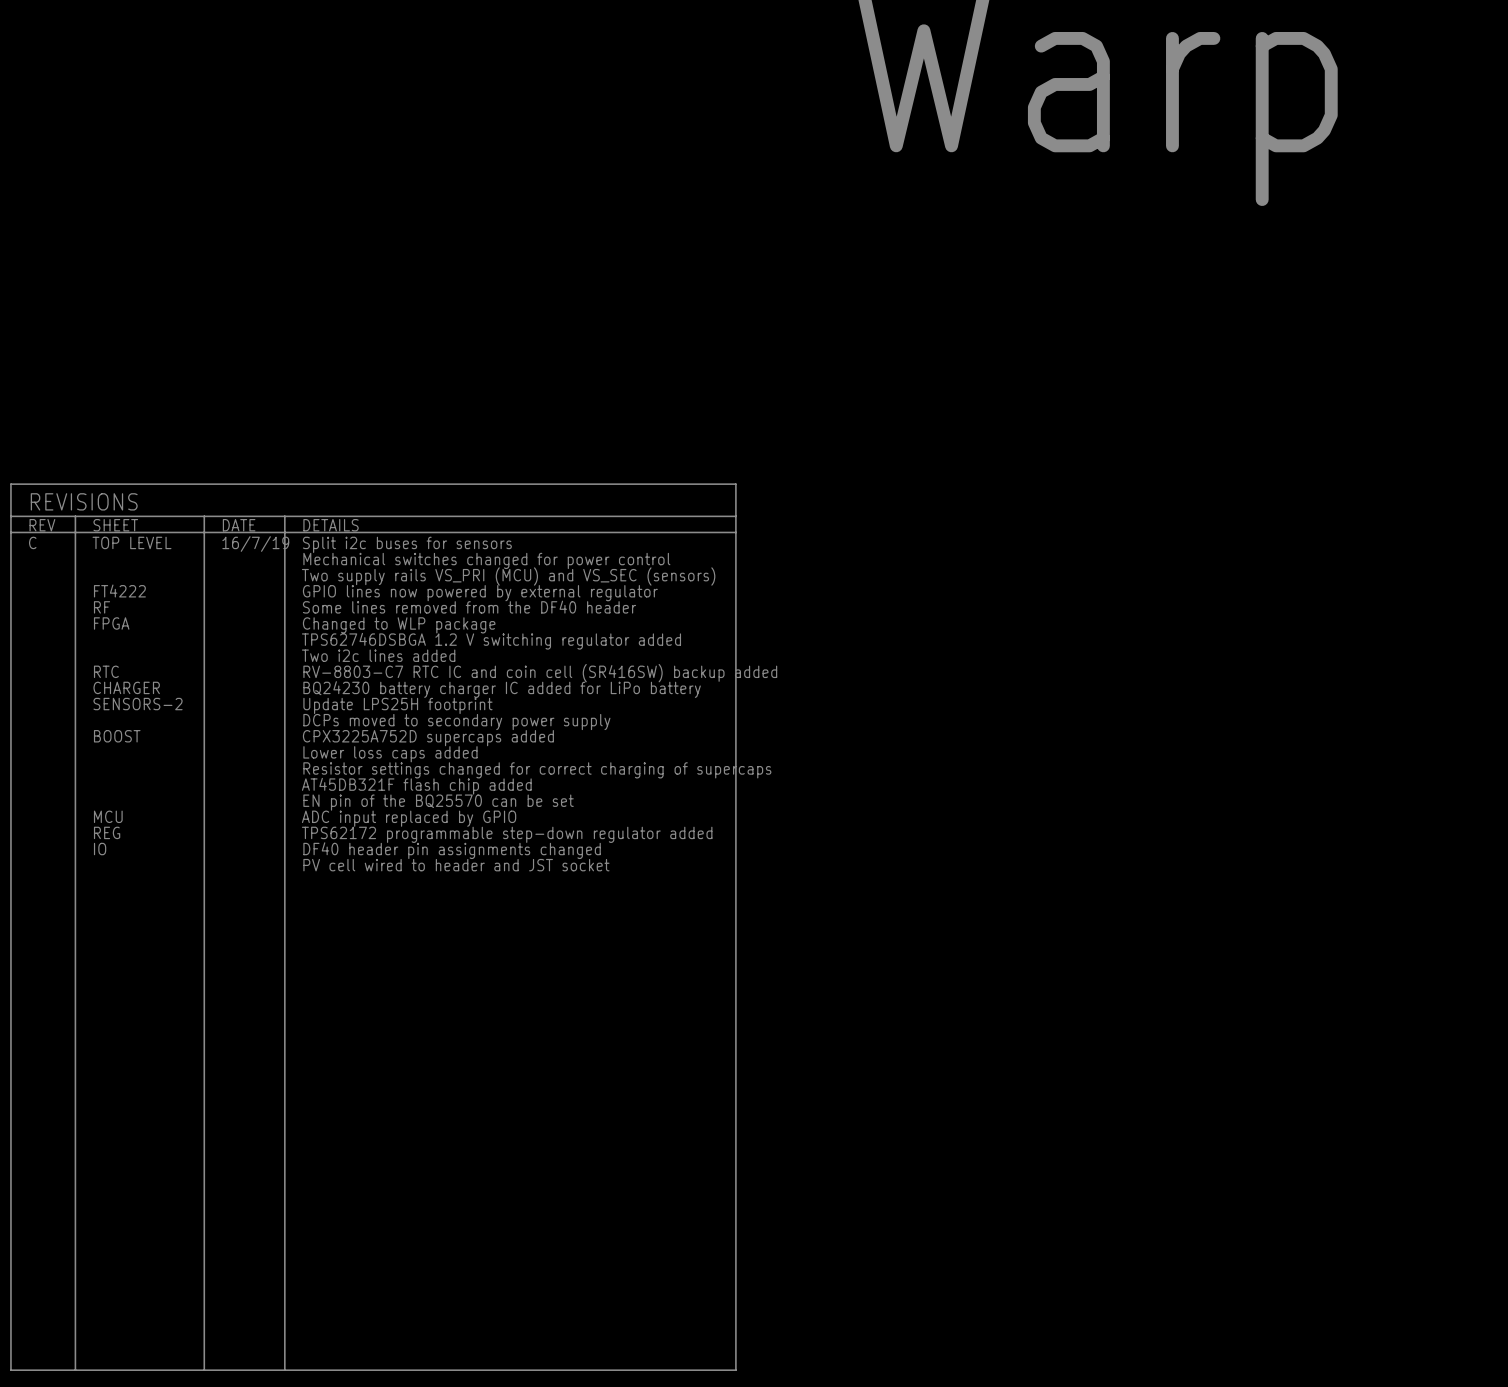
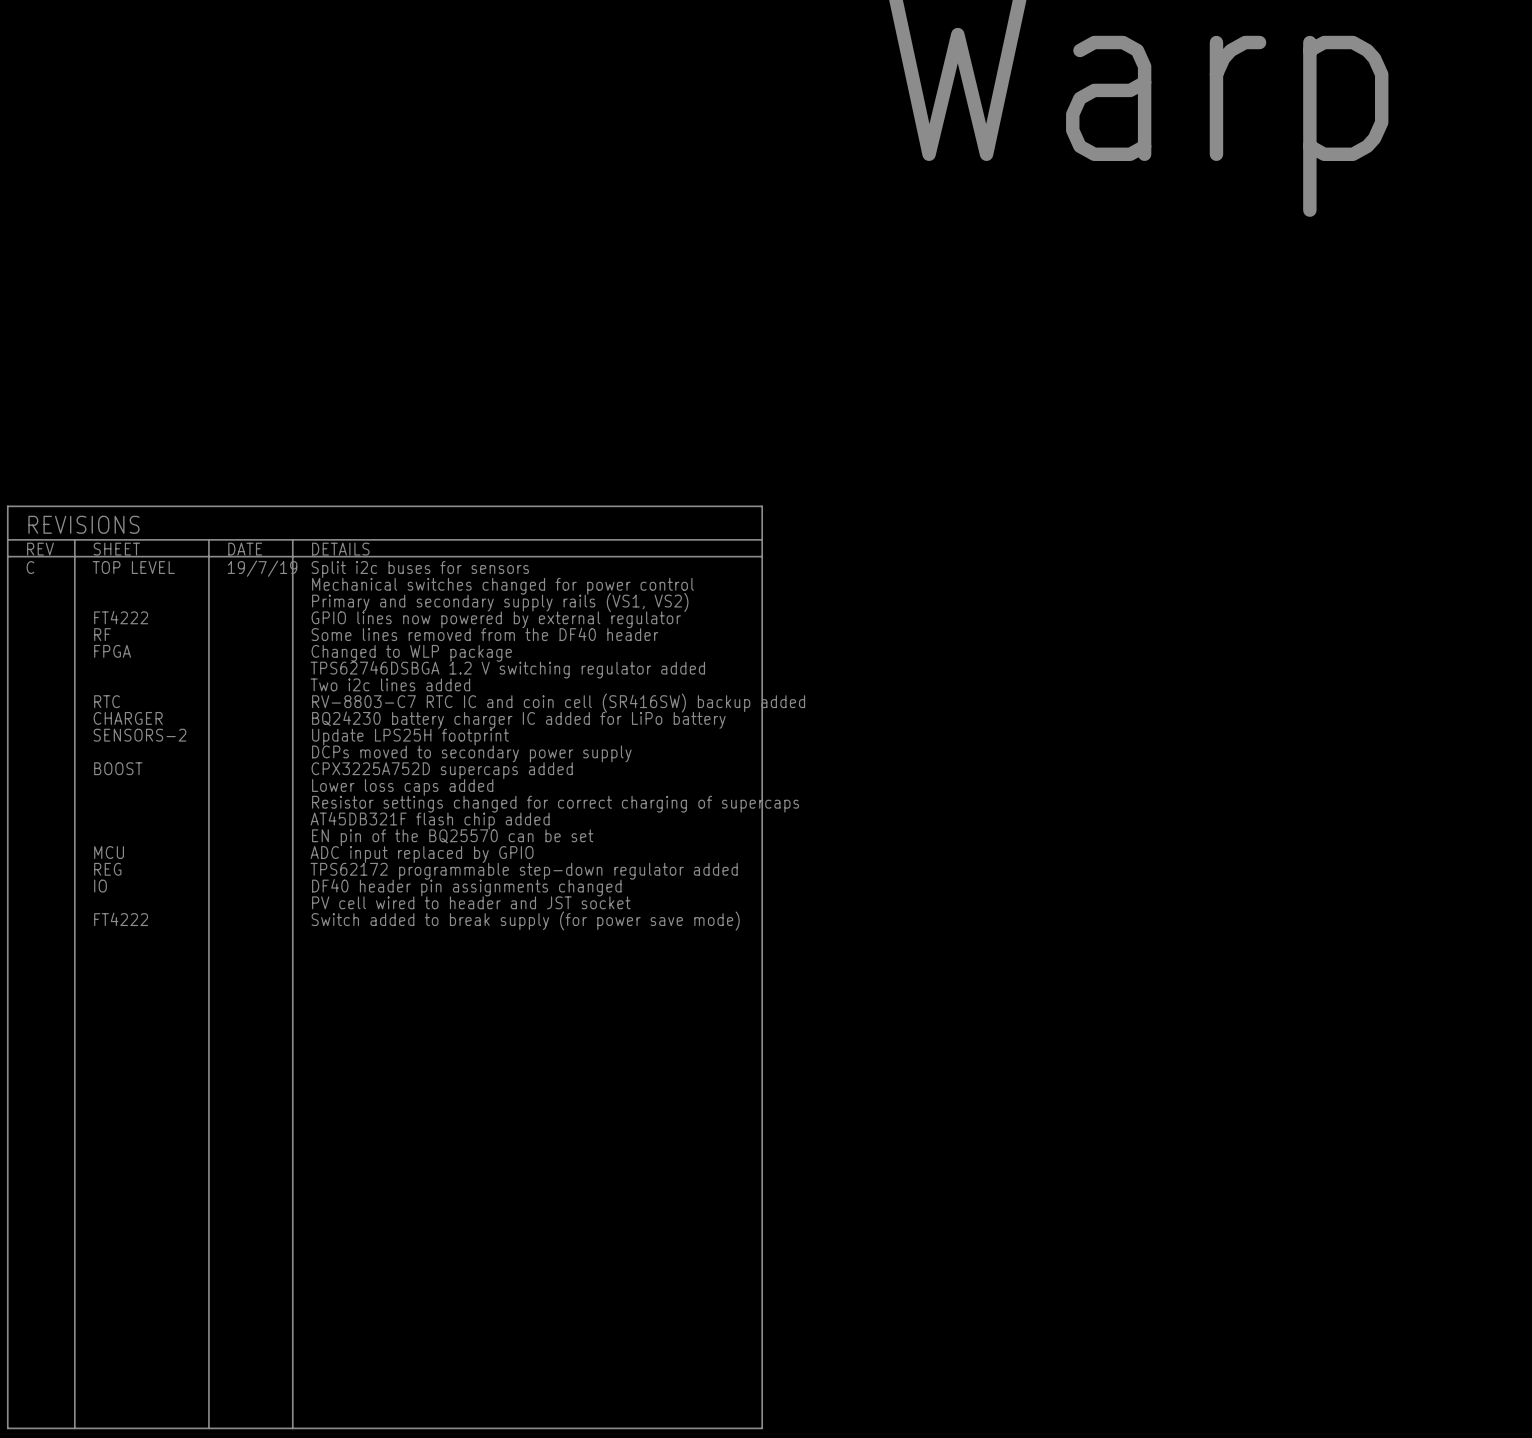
text: 16/7/19 (255, 544) -> 19/7/19 (262, 568)
text: Two supply rails VS_PRI (MCU) and VS_SEC (sensors) (508, 576) -> Primary and secondary supply rails (VS1, VS2) (500, 602)
text: none -> FT4222 (121, 919)
text: none -> Switch added to break supply (for power save mode) (525, 920)

